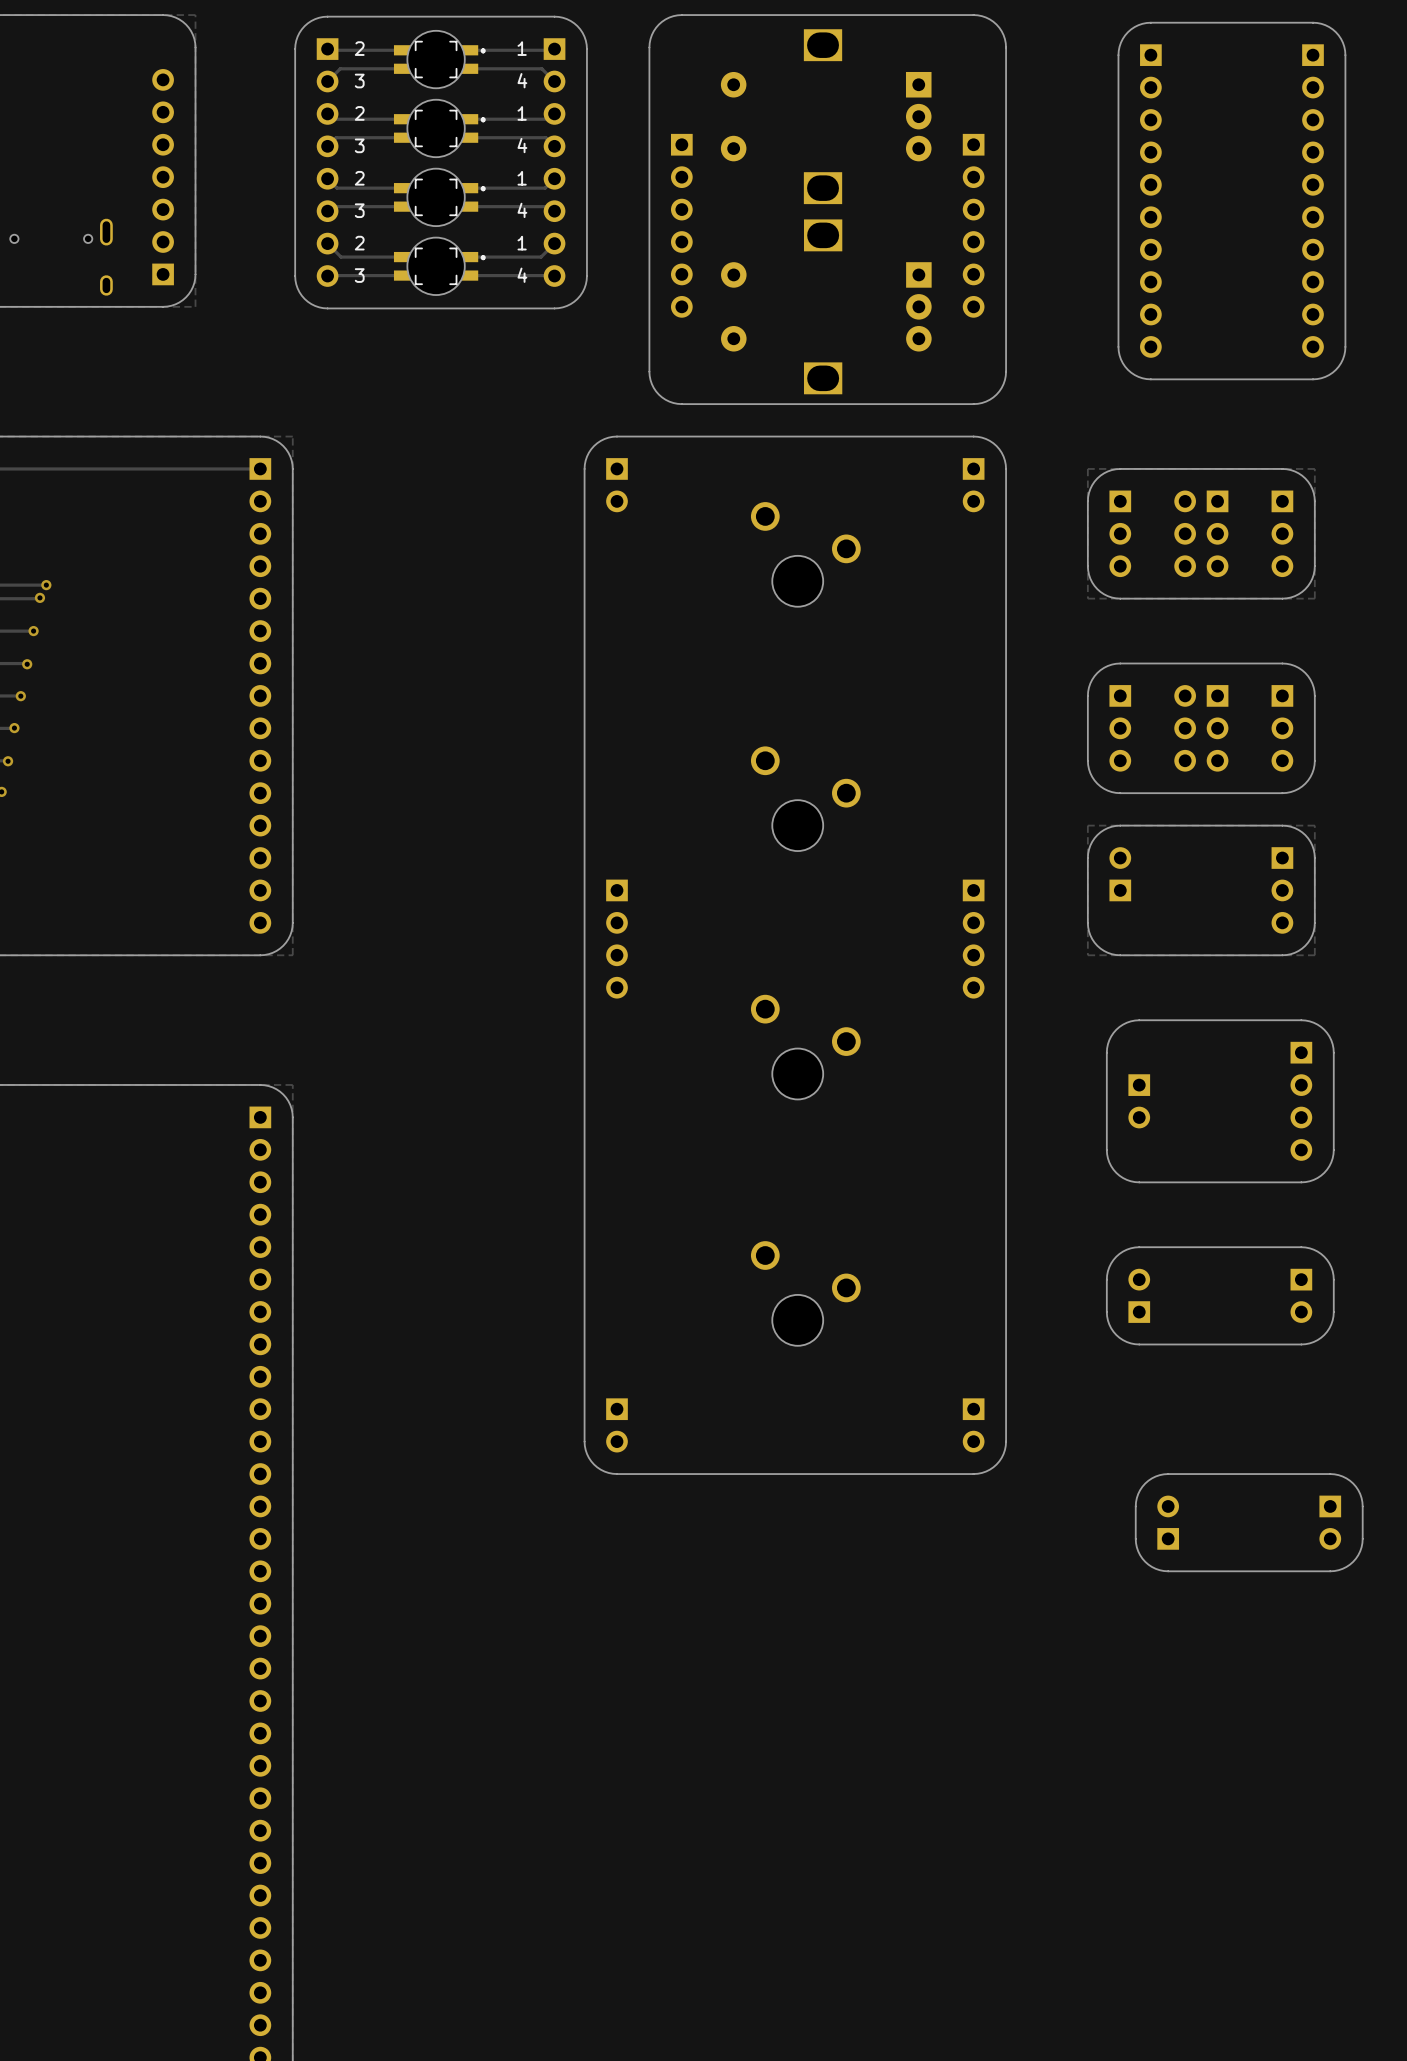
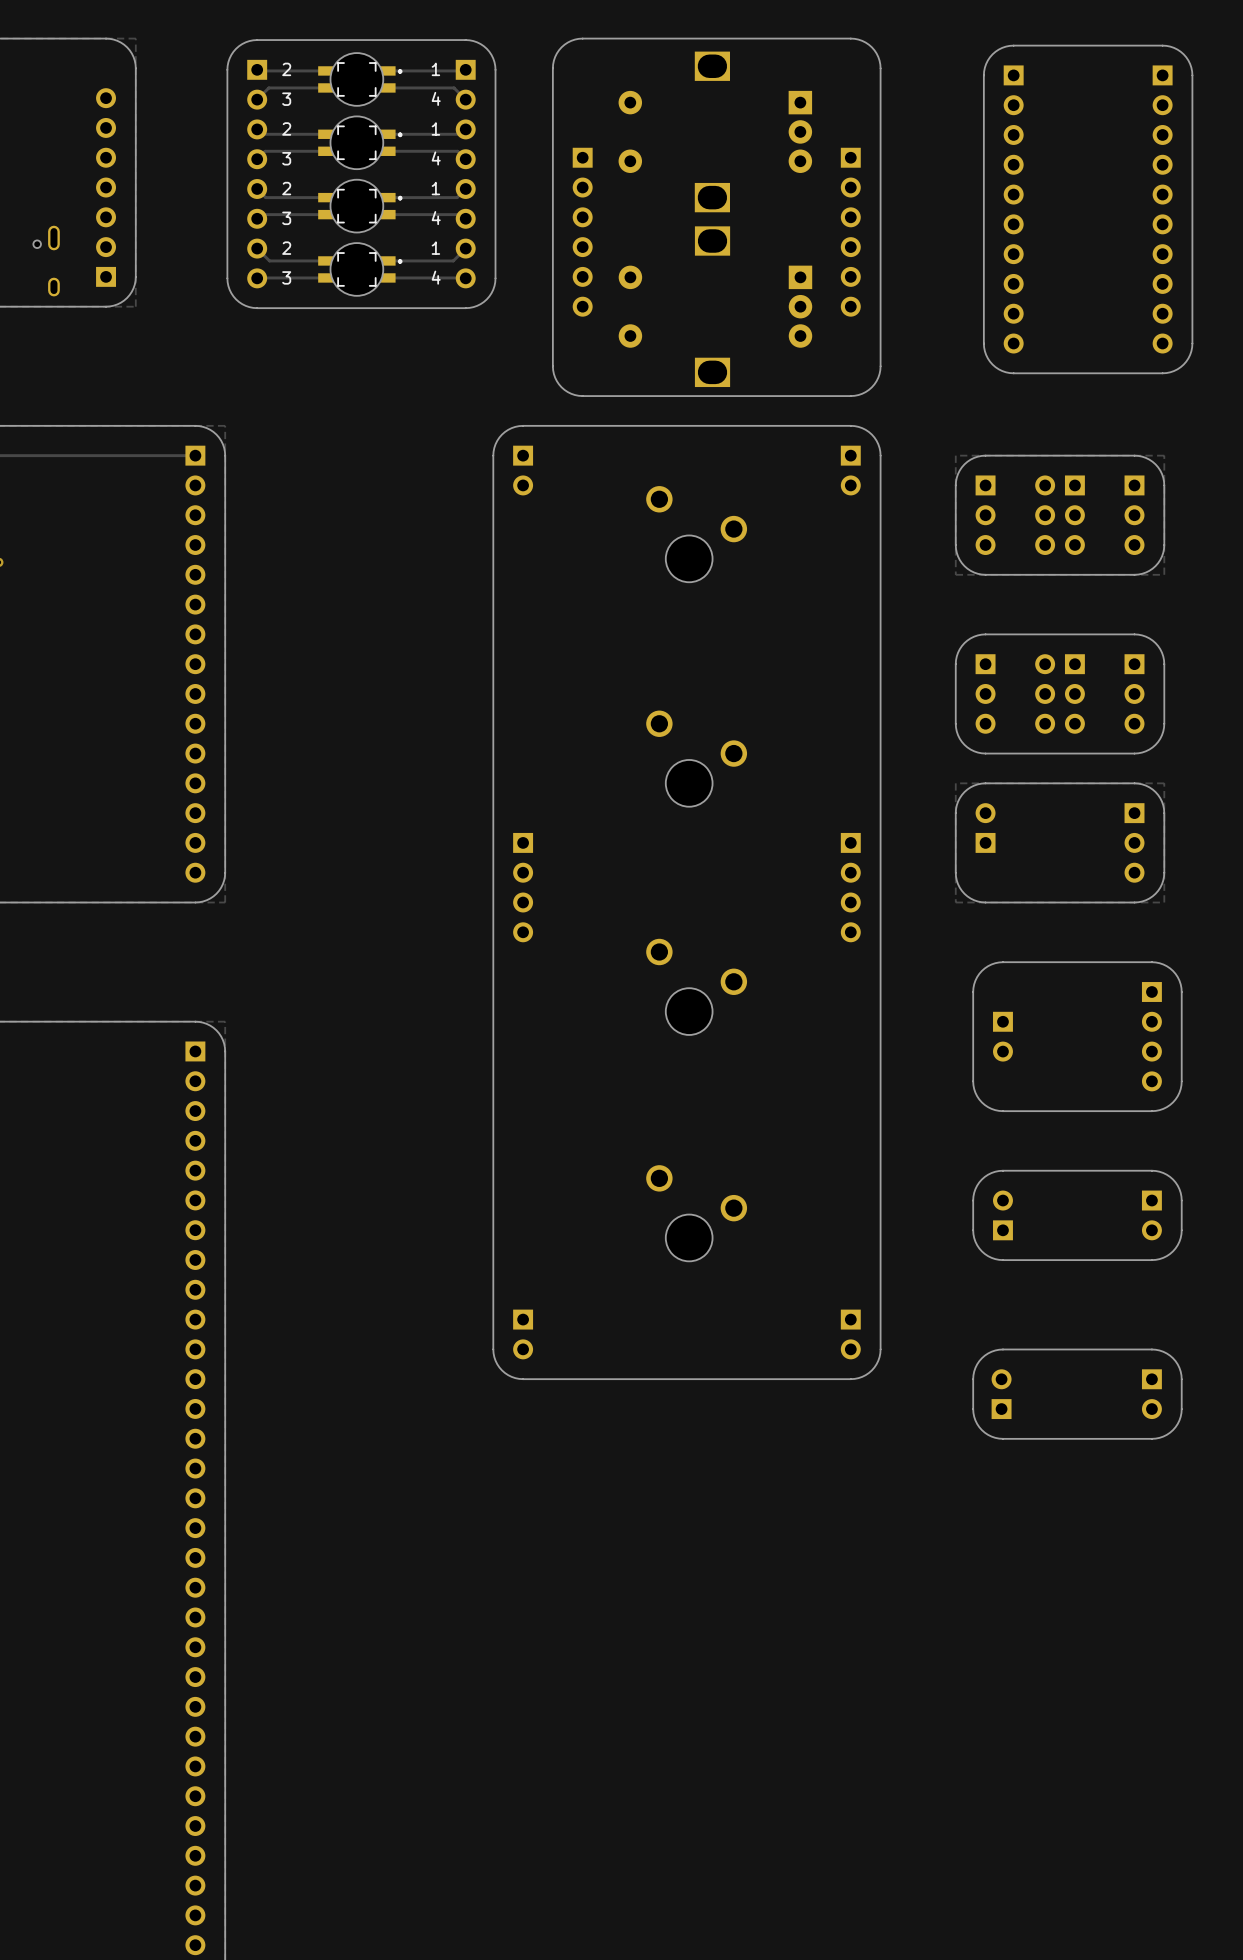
board edge: (1330, 1474) (1168, 1474) (1155, 1476) (1145, 1483) (1136, 1498) (1135, 1538) (1138, 1551) (1148, 1564) (1163, 1571) (1330, 1571) (1342, 1568) (1353, 1561) (1361, 1547) (1362, 1502) (1360, 1494) (1353, 1483) (1342, 1476) (1330, 1474) -> (1151, 1349) (1002, 1349) (991, 1351) (981, 1358) (974, 1371) (973, 1409) (975, 1420) (984, 1432) (999, 1438) (1151, 1438) (1163, 1436) (1172, 1430) (1180, 1416) (1181, 1375) (1177, 1364) (1170, 1355) (1159, 1350) (1151, 1349)
part position: (1168, 1522) -> (1001, 1394)
part position: (1330, 1522) -> (1151, 1394)

